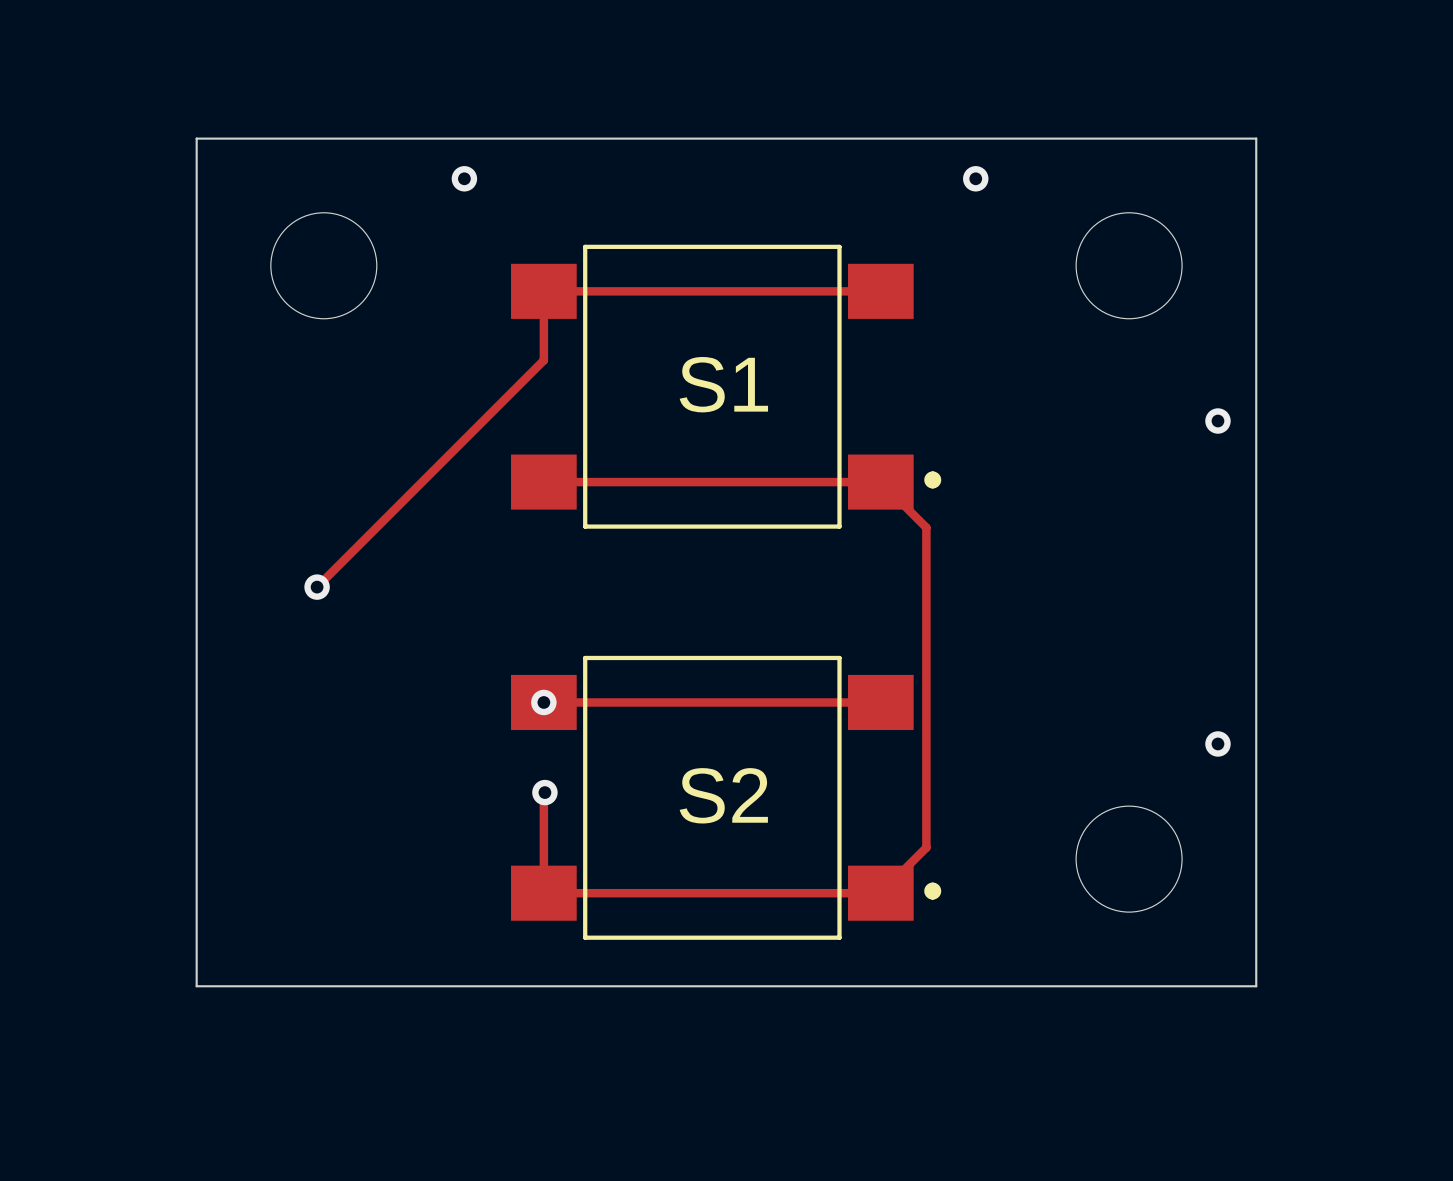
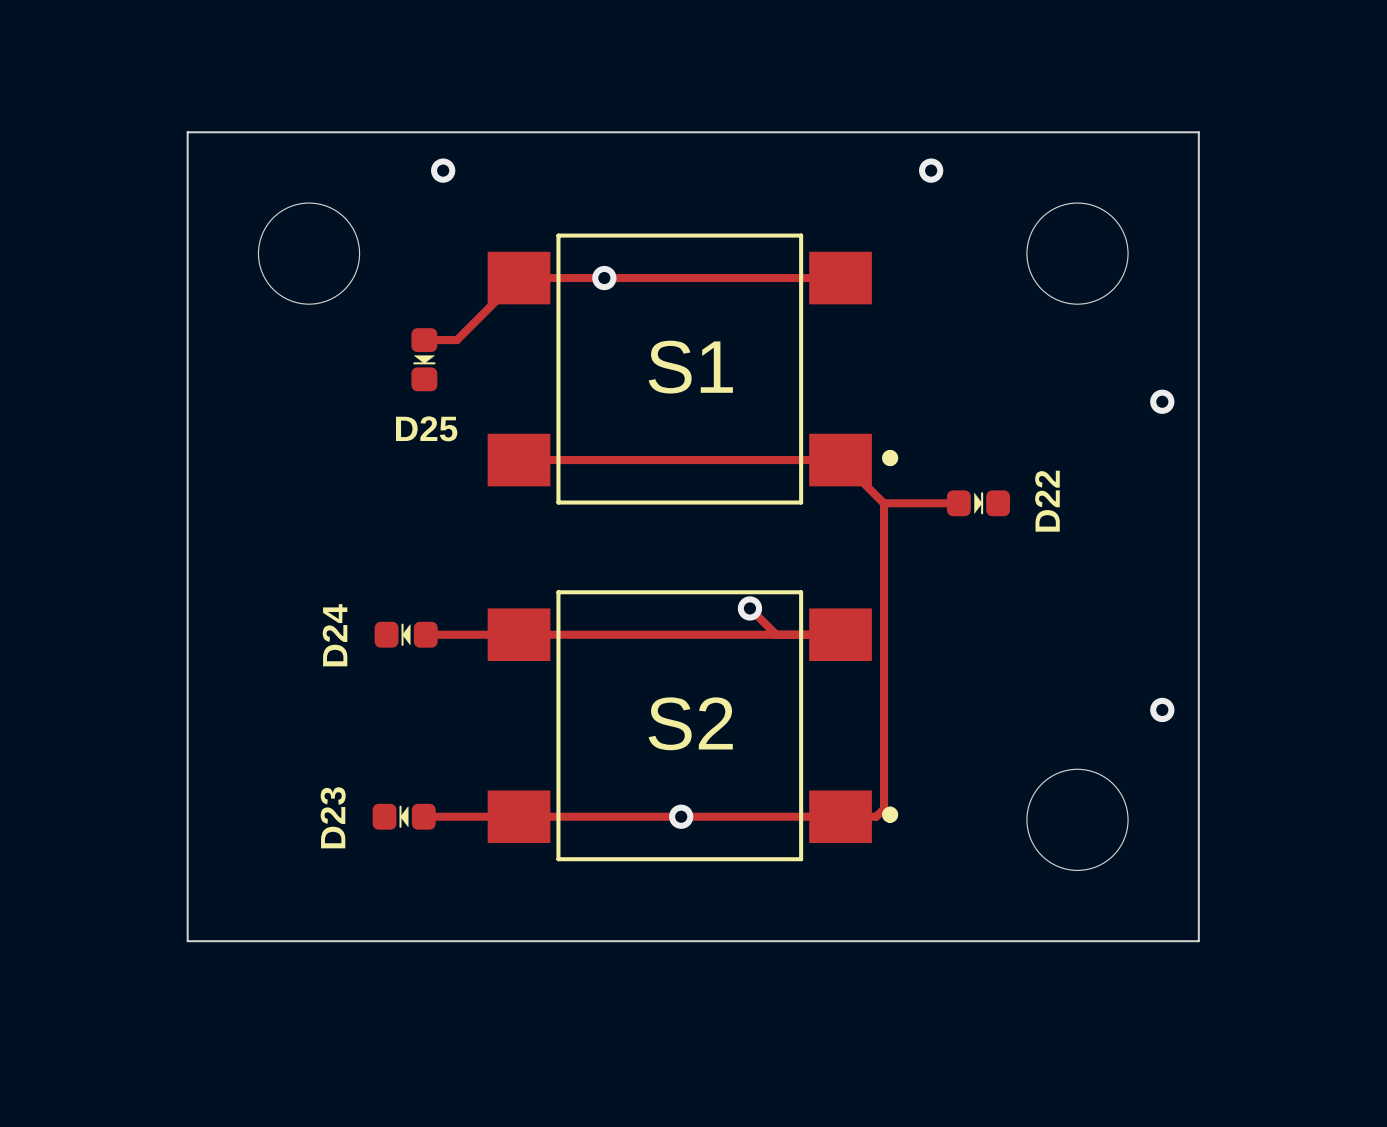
track: (543, 291) (543, 360) (317, 587) -> (519, 278) (456, 340) (424, 340)
via: none -> (604, 278)
D25: none -> (424, 359)
track: none -> (884, 503) (958, 503)
D22: none -> (978, 503)
via: (317, 587) -> none
track: none -> (749, 608) (776, 634)
via: none -> (749, 608)
D24: none -> (406, 634)
track: none -> (425, 634) (840, 634)
track: (543, 702) (880, 702) -> none
via: (543, 702) -> none
track: (544, 792) (543, 893) (880, 893) (918, 855) -> (423, 816) (876, 816)
via: (544, 792) -> none
S2 position: (726, 797) -> (692, 725)
D23: none -> (404, 816)
via: none -> (681, 816)

